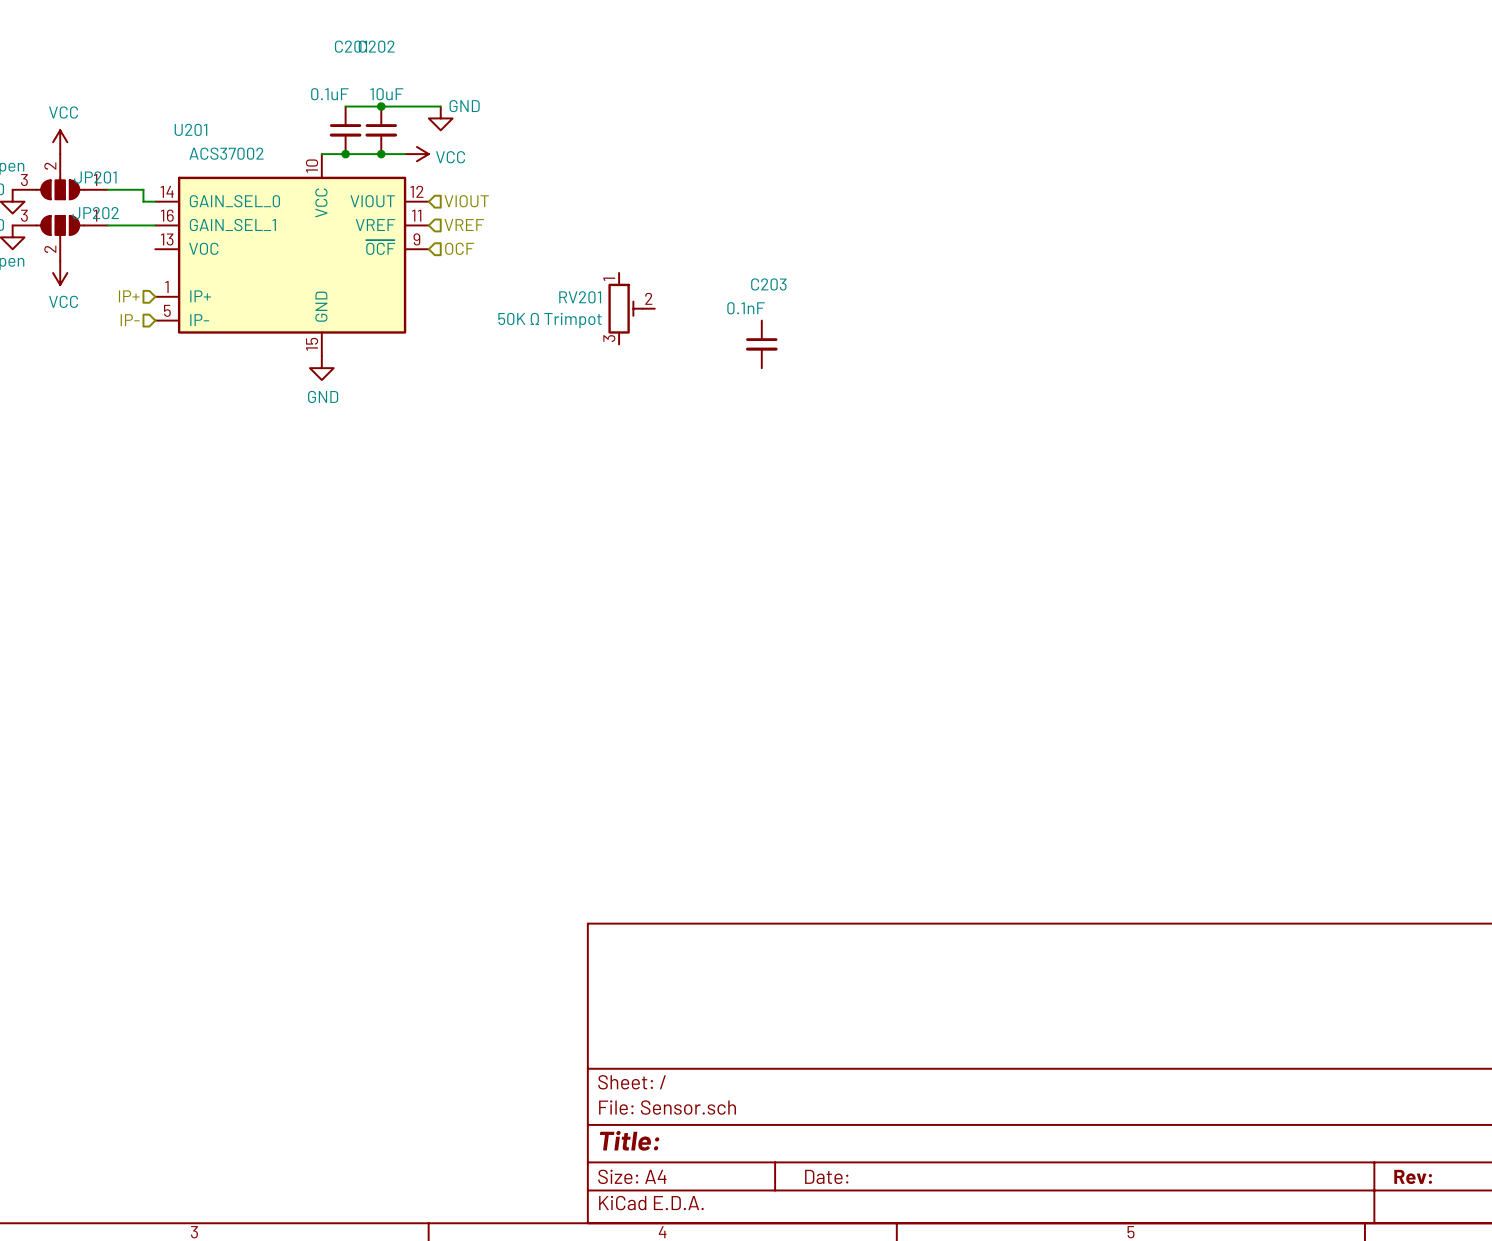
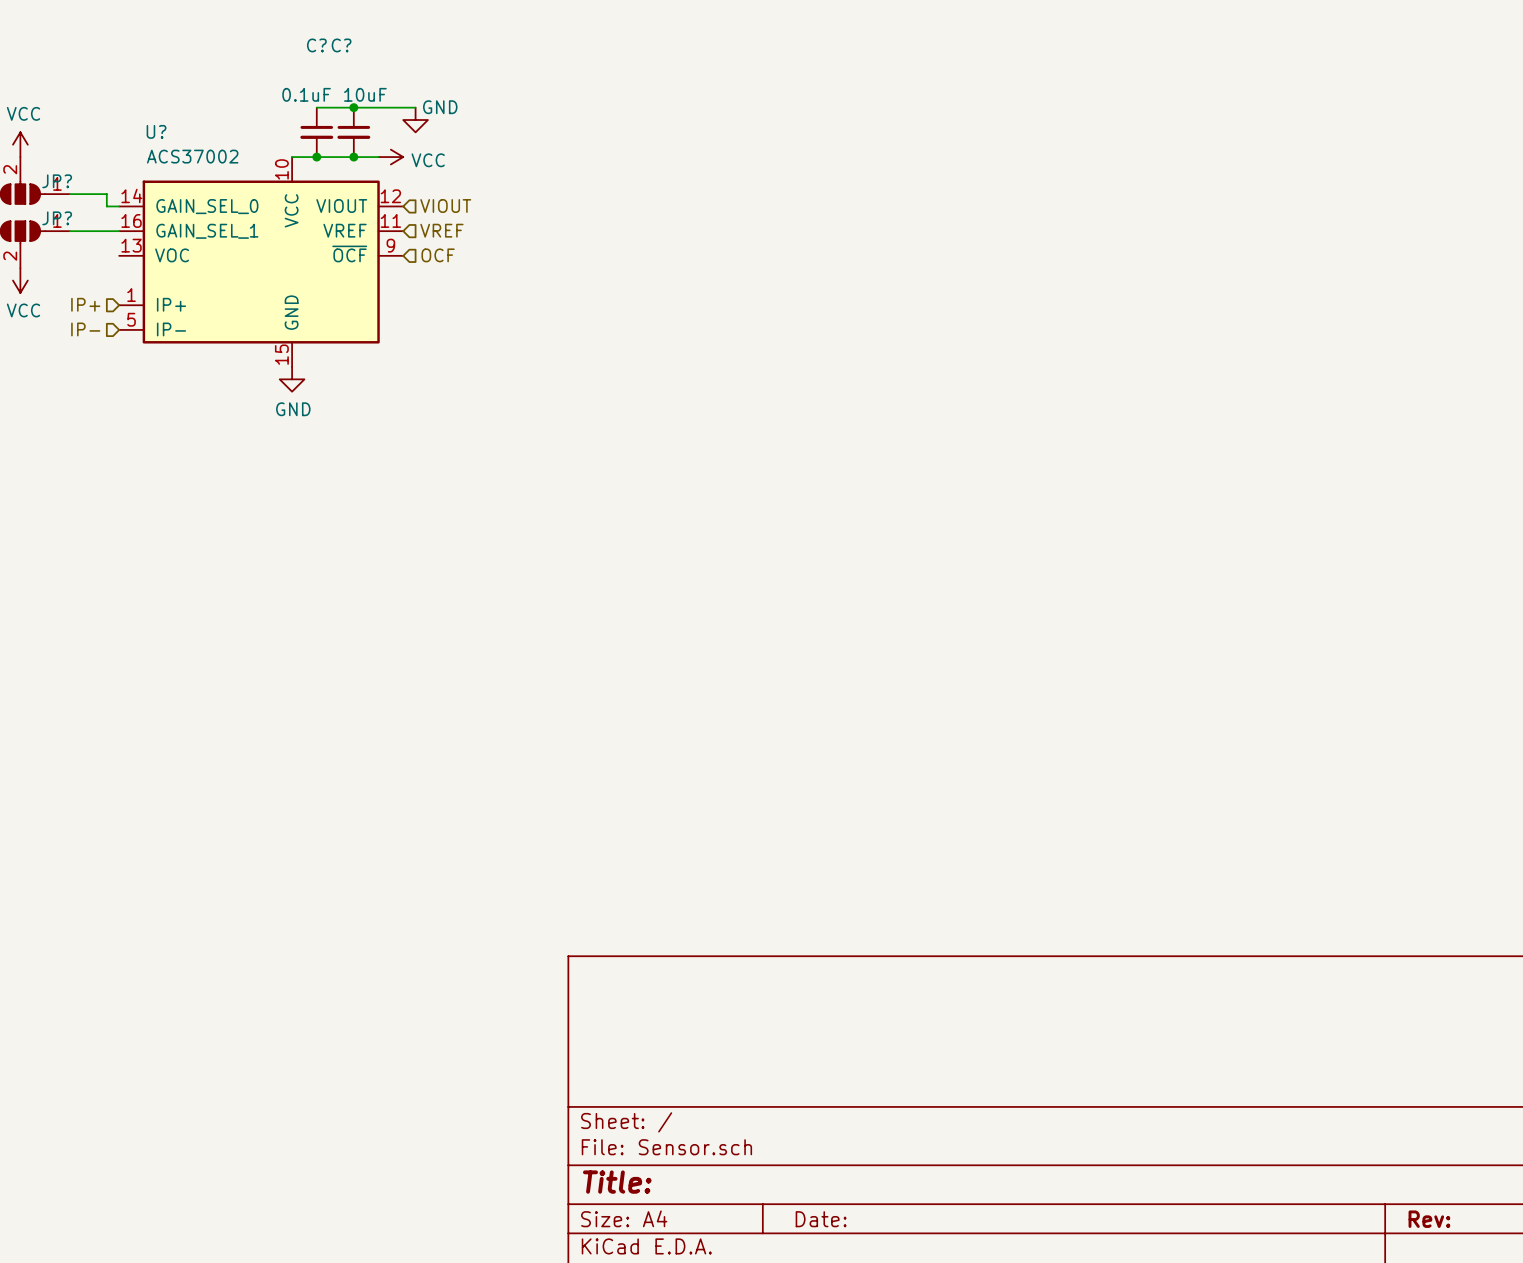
C201 name: C201 (351, 46) -> C? (316, 45)
C202 name: C202 (376, 46) -> C? (341, 45)
U201 name: U201 (190, 129) -> U? (156, 131)
JP201 name: JP201 (95, 177) -> JP? (57, 181)
JP202 name: JP202 (95, 213) -> JP? (57, 218)
RV201: 50K Ω Trimpot (631, 308) -> none
C203: 0.1nF (761, 344) -> none

